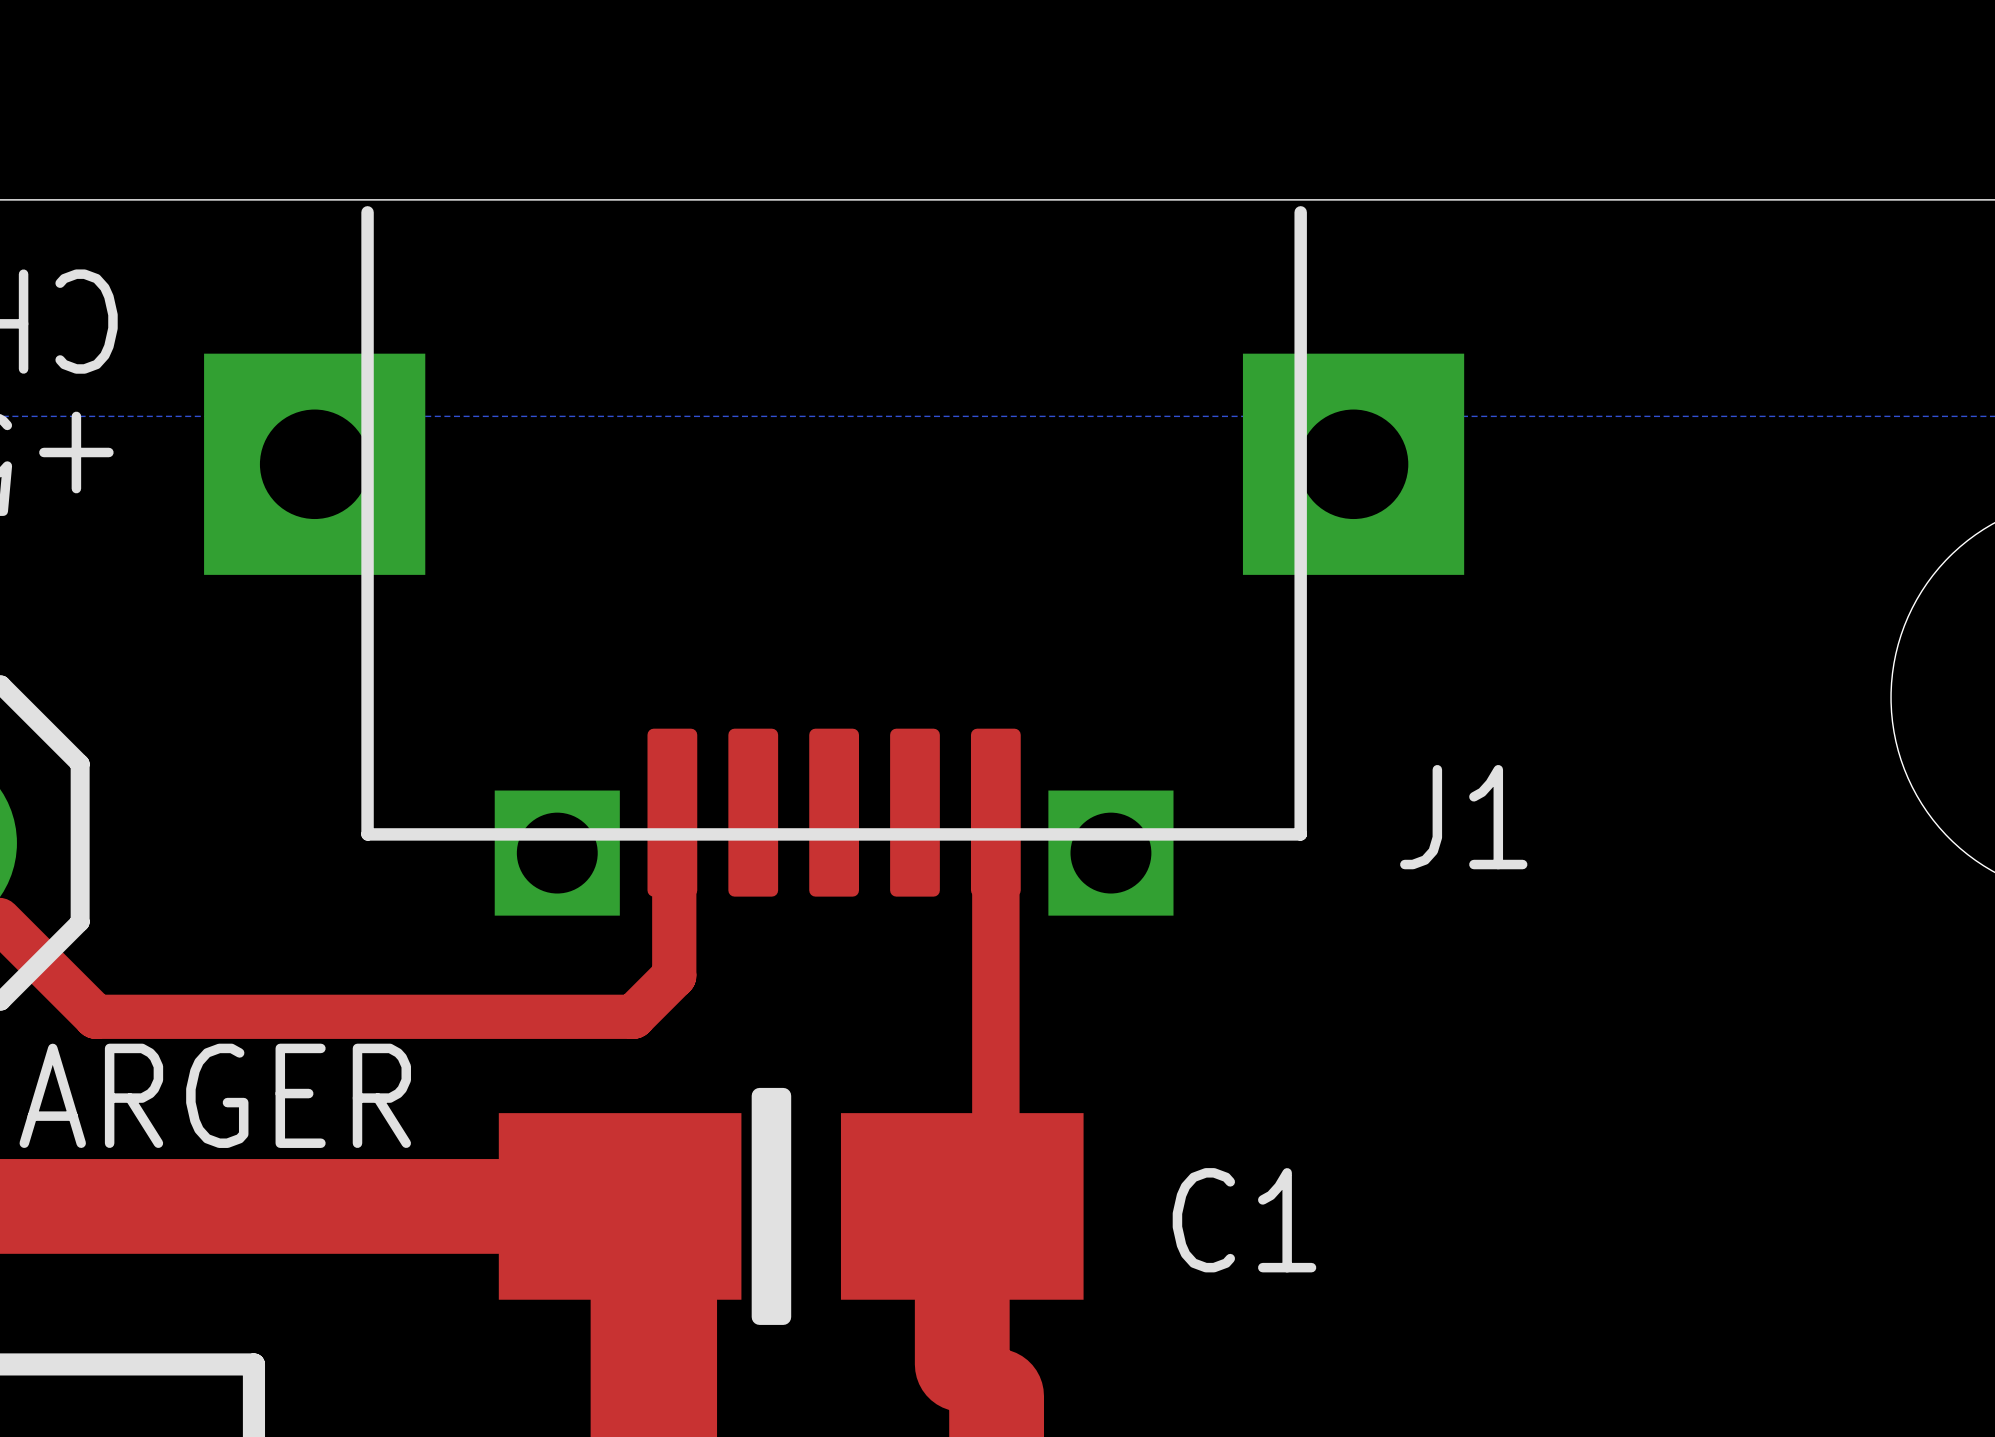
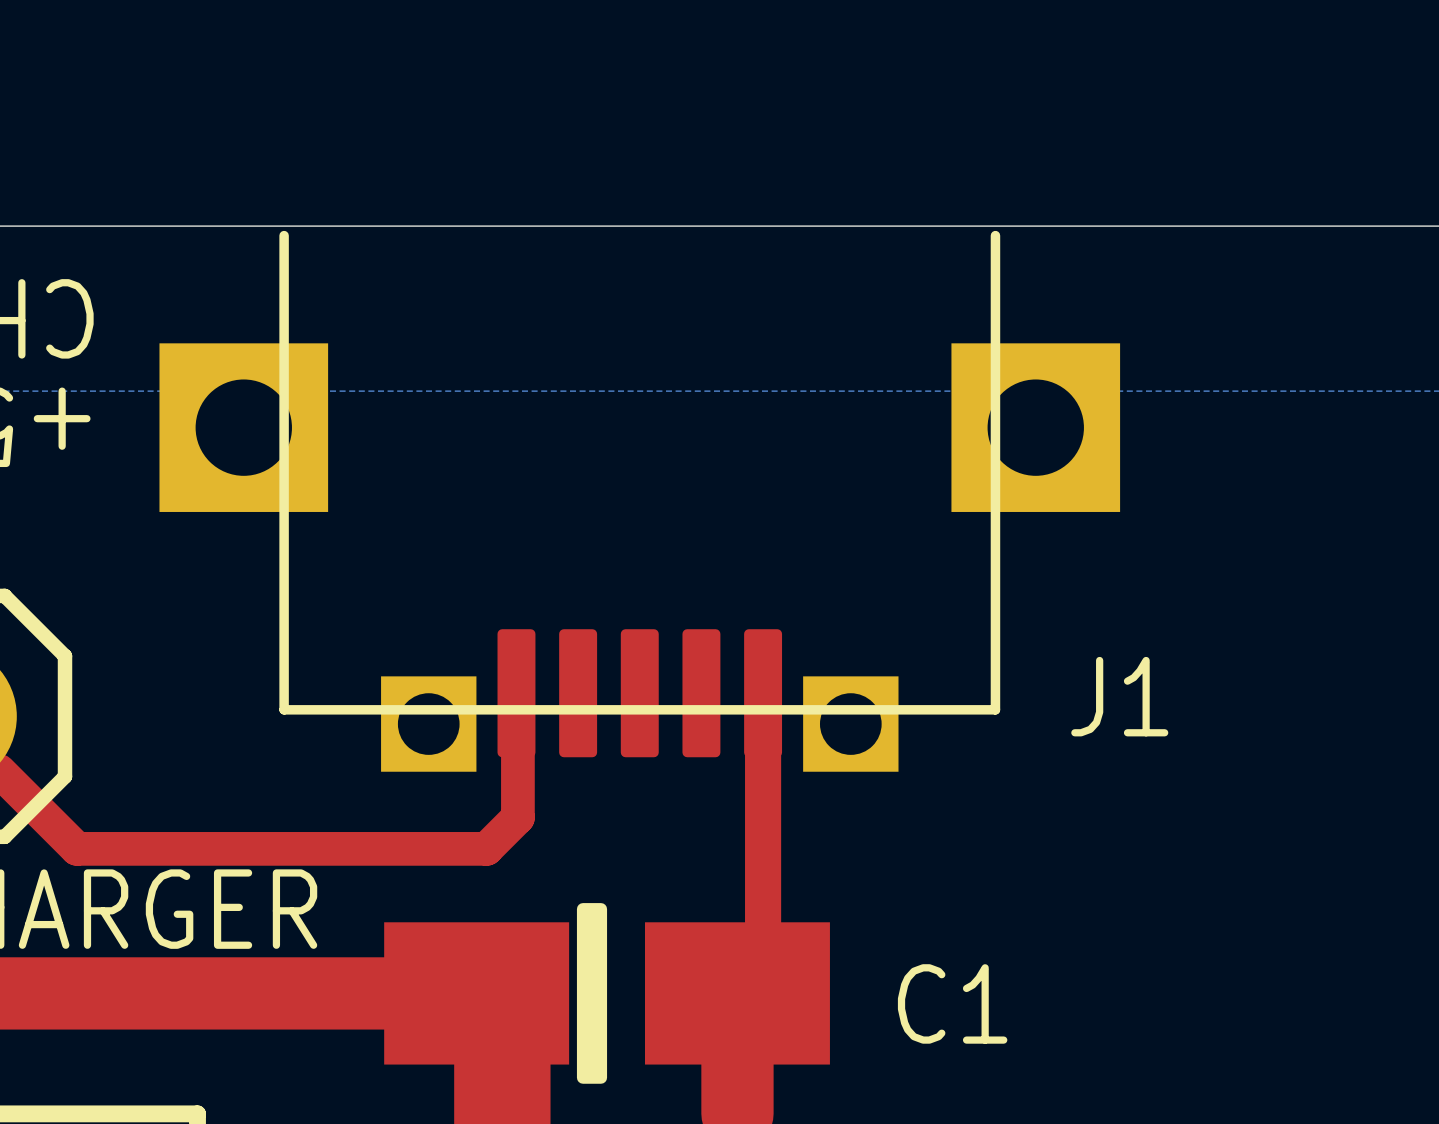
J1 footprint: [204, 206, 1465, 916] -> [159, 230, 1121, 772]

